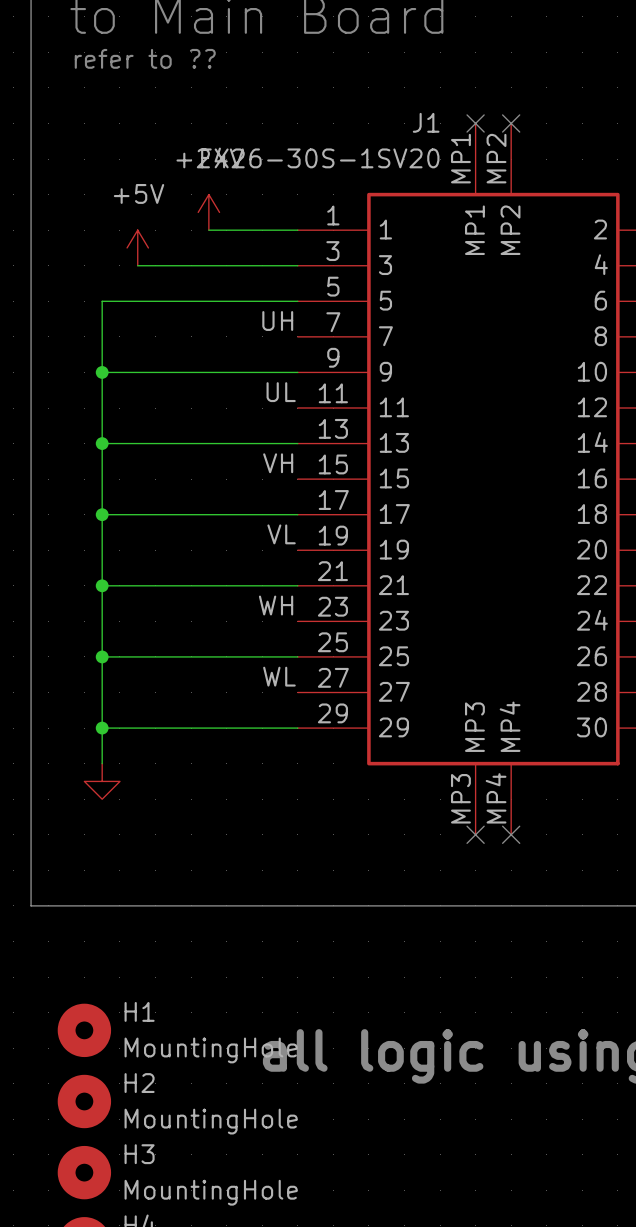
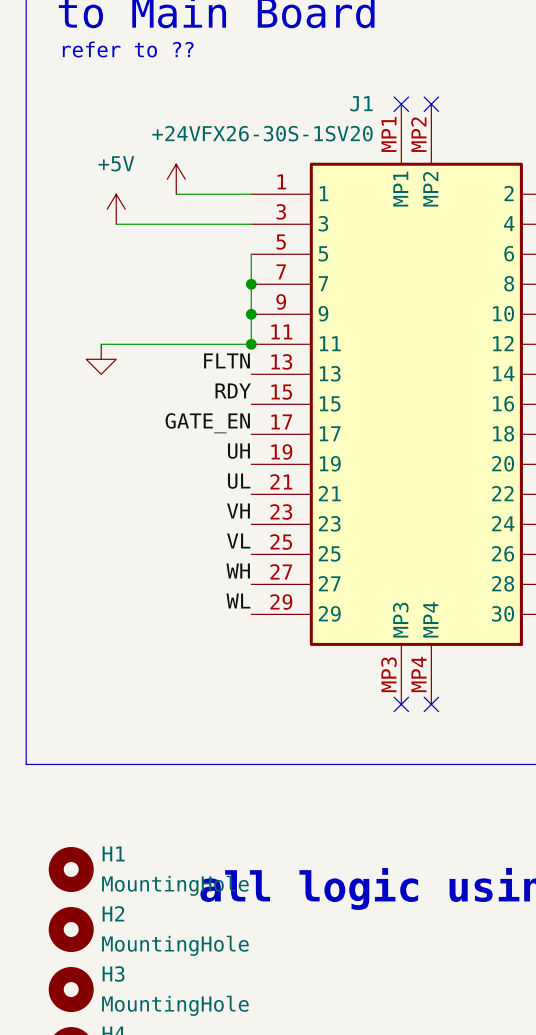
wire: (297, 301) (102, 301) (102, 763) -> (251, 254) (251, 344) (101, 344)
label: UH (277, 321) -> none
junction: none -> (251, 284)
wire: (102, 372) (297, 372) -> none
junction: (102, 372) -> none
junction: none -> (251, 314)
label position: UL (281, 392) -> UL (239, 481)
junction: none -> (251, 344)
power symbol: none -> (101, 359)
label: none -> FLTN (226, 360)
wire: (102, 443) (297, 443) -> none
junction: (102, 443) -> none
label: VH (278, 463) -> RDY (233, 390)
label: none -> GATE_EN (207, 423)
wire: (102, 514) (297, 514) -> none
junction: (102, 514) -> none
label: VL (281, 534) -> UH (238, 451)
wire: (102, 585) (297, 585) -> none
junction: (102, 585) -> none
label: WH (276, 605) -> VH (238, 510)
label: none -> VL (238, 540)
wire: (102, 656) (297, 656) -> none
junction: (102, 656) -> none
label: WL (279, 676) -> WH (238, 570)
label: none -> WL (238, 601)
wire: (102, 728) (297, 728) -> none
junction: (102, 728) -> none
power symbol: (102, 781) -> none

